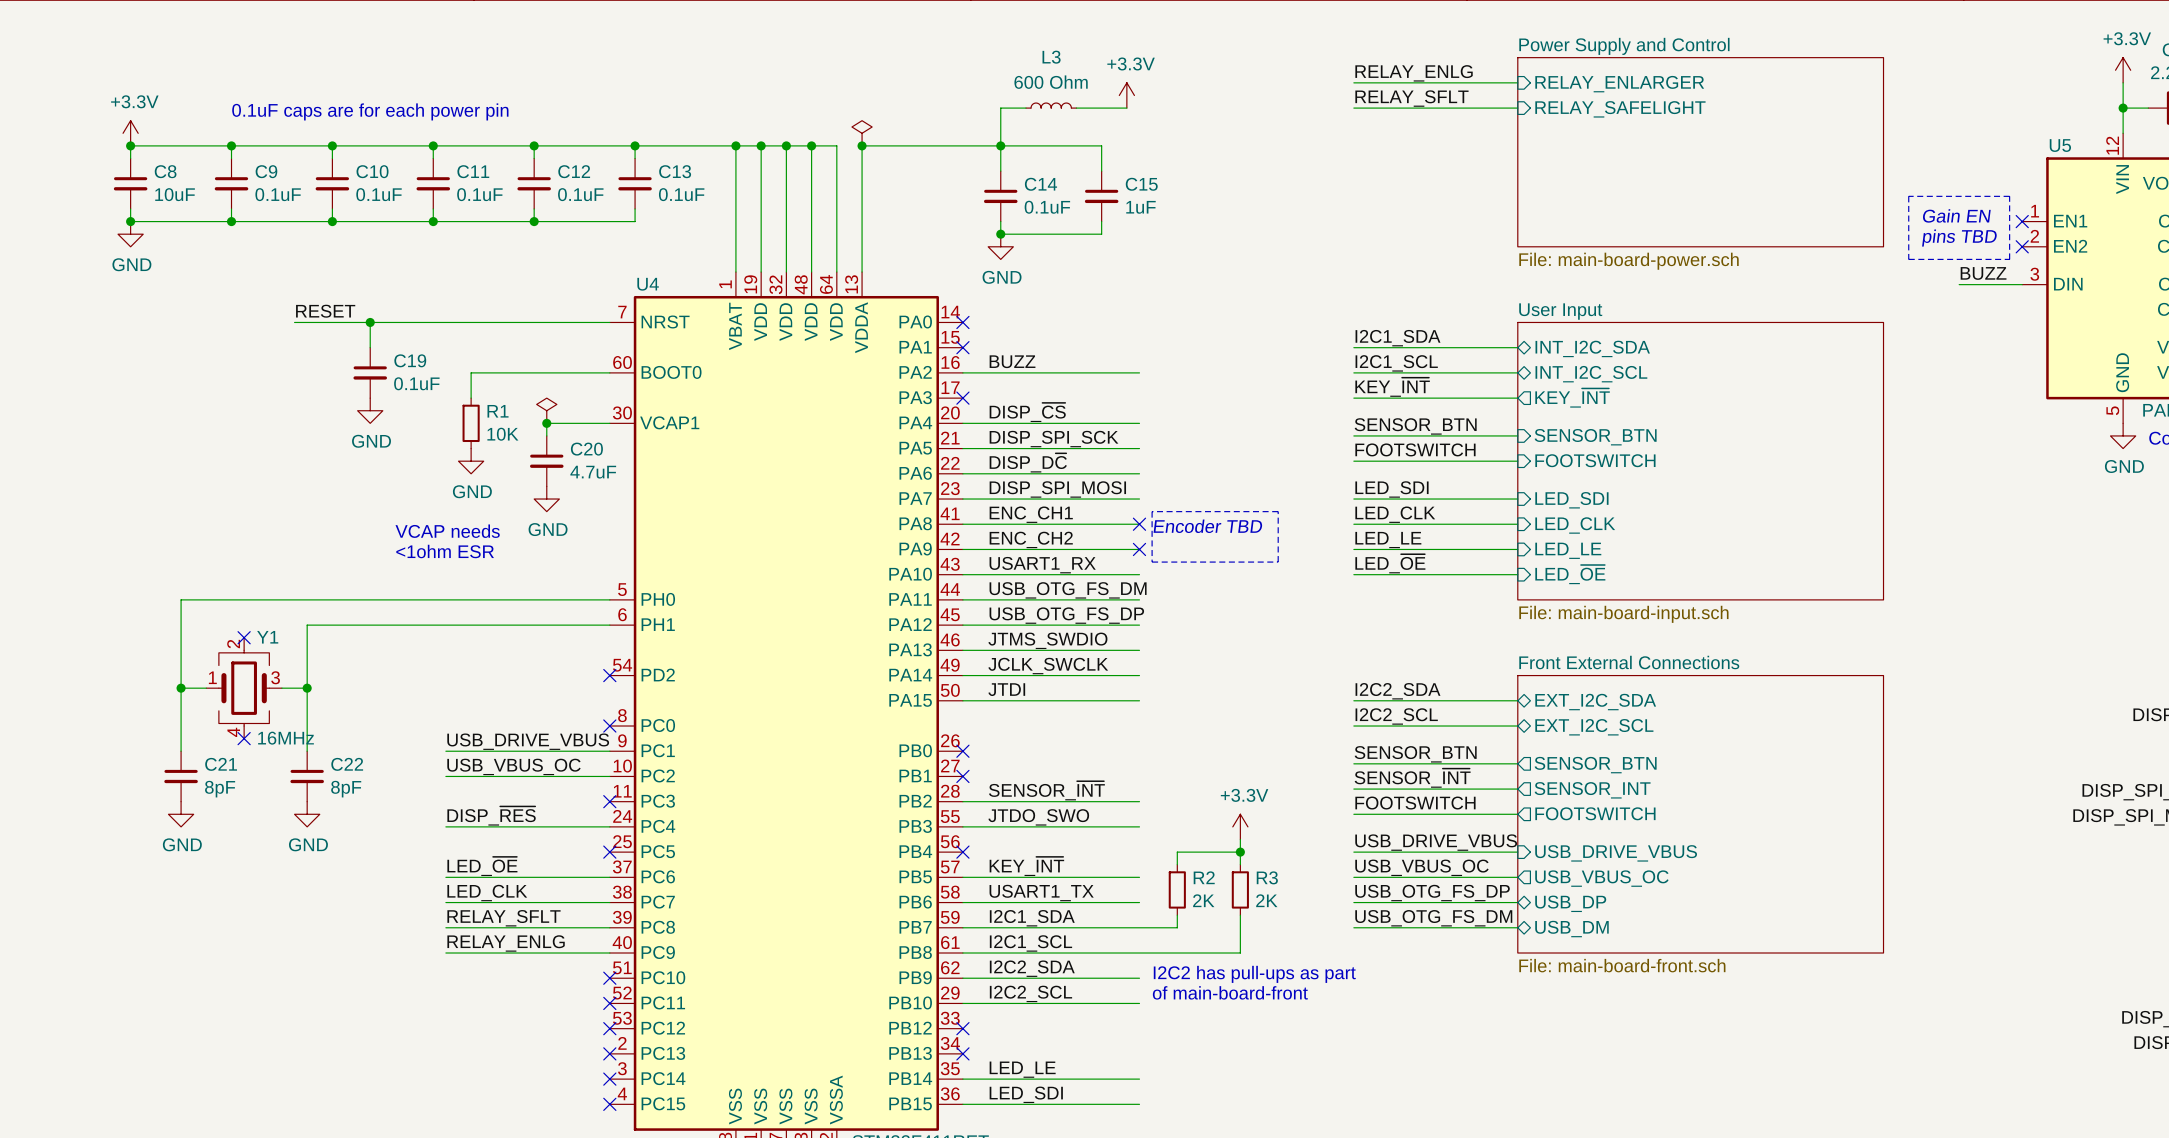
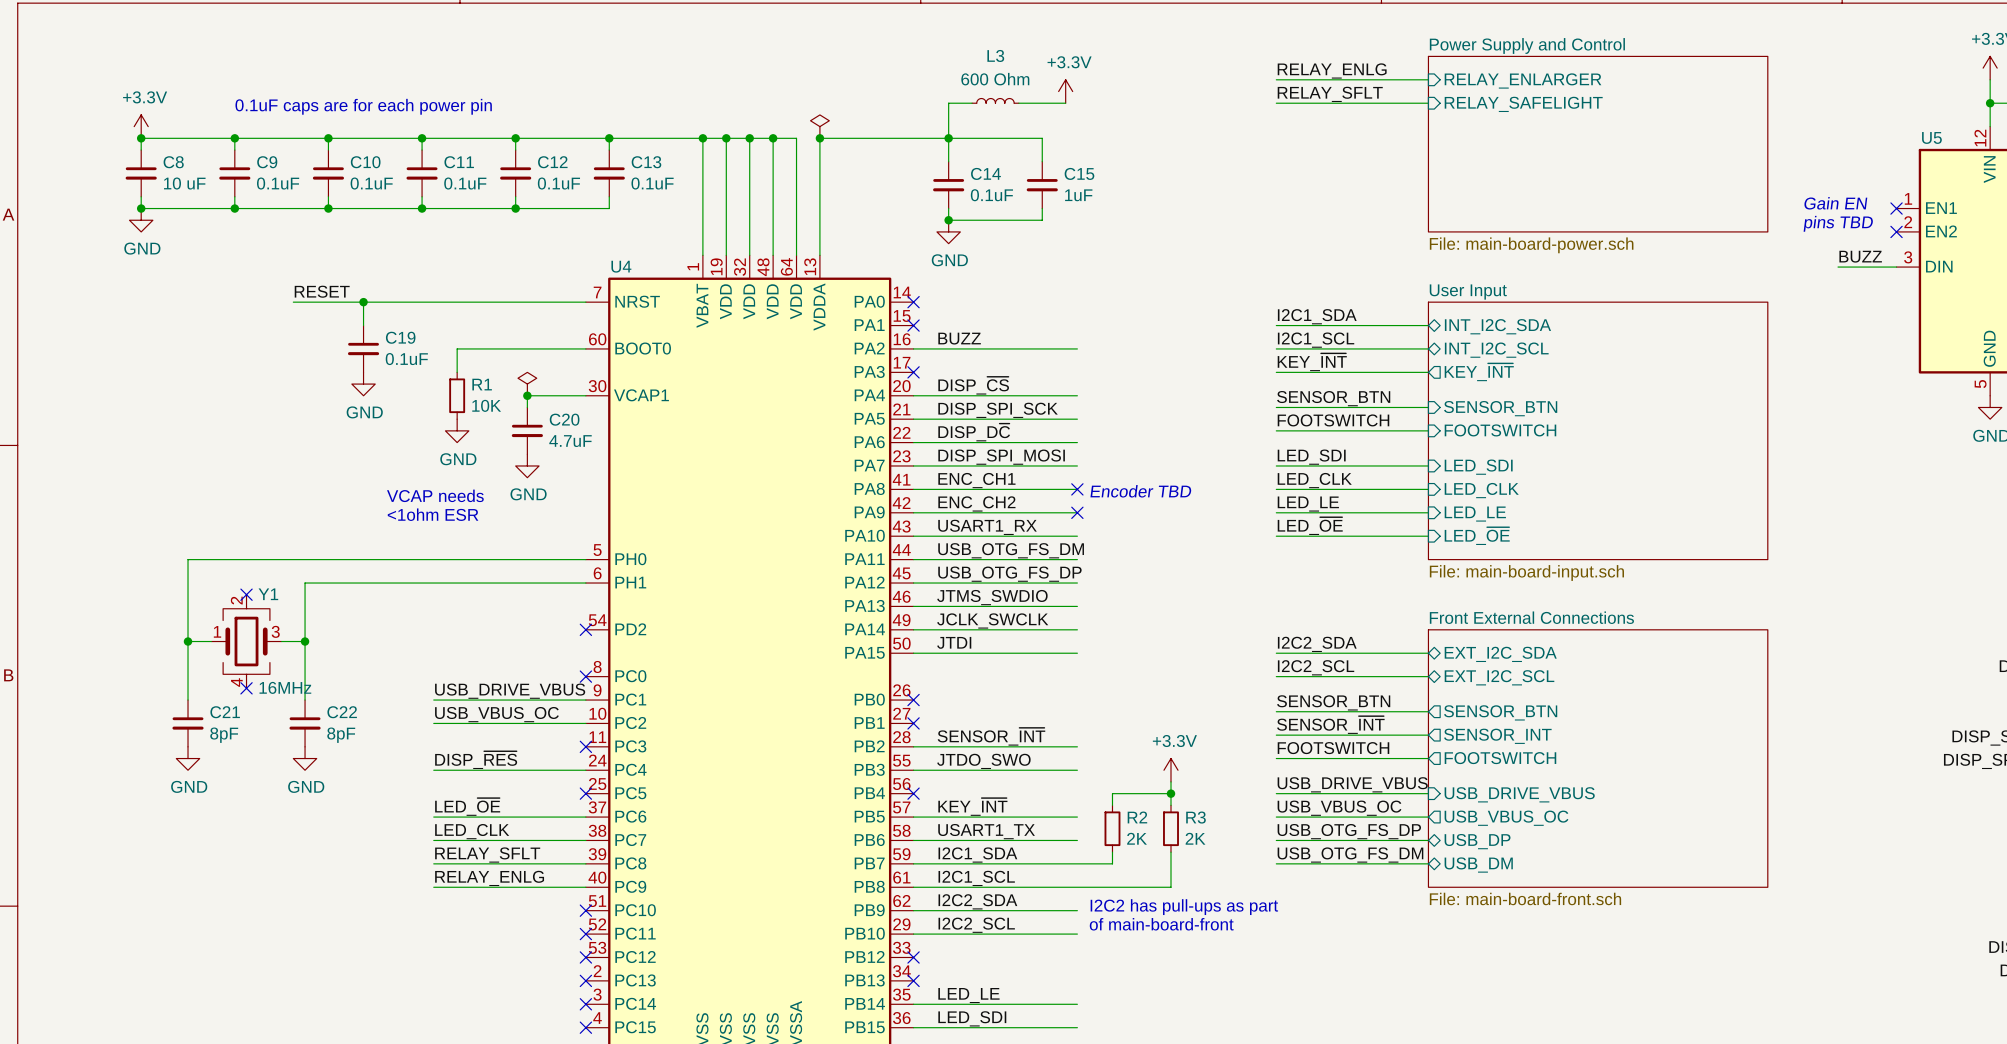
C8 value: 10uF (175, 194) -> 10 uF (184, 183)
line: (1908, 196) (2009, 196) (2009, 259) (1908, 259) (1908, 196) -> none
line: (1152, 511) (1152, 562) (1278, 562) (1278, 511) (1152, 511) -> none

